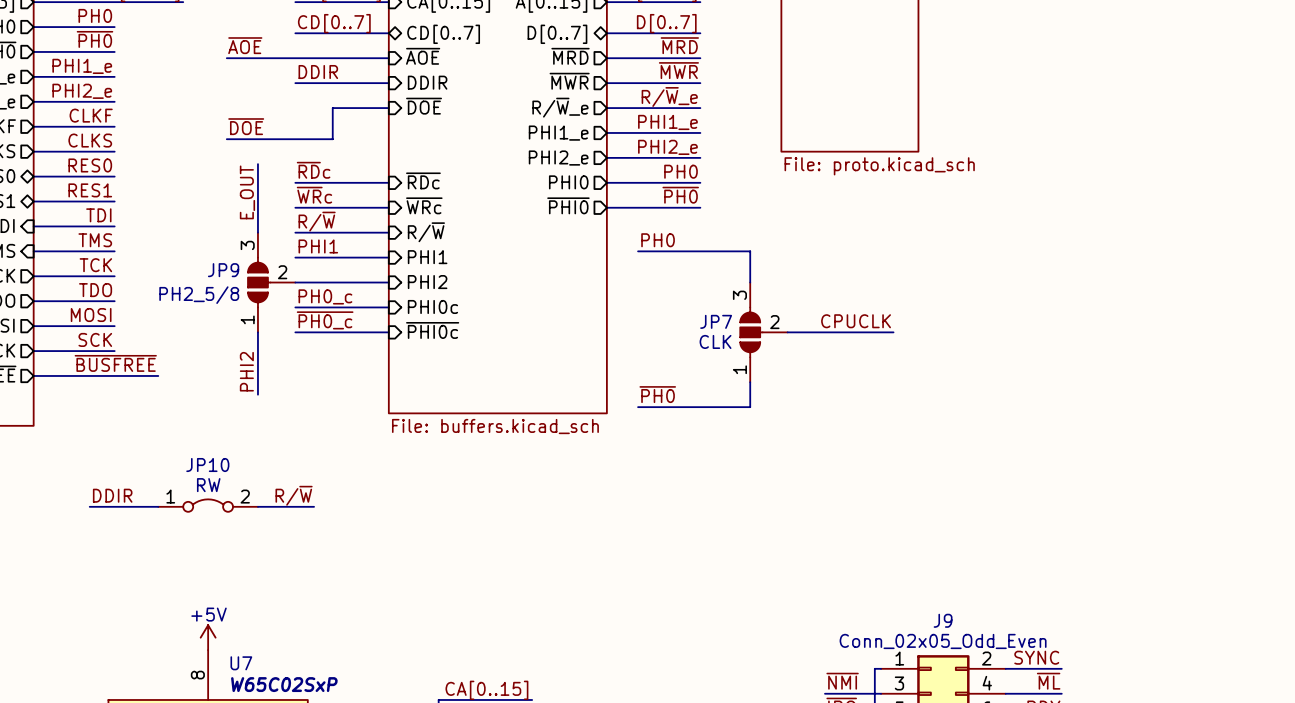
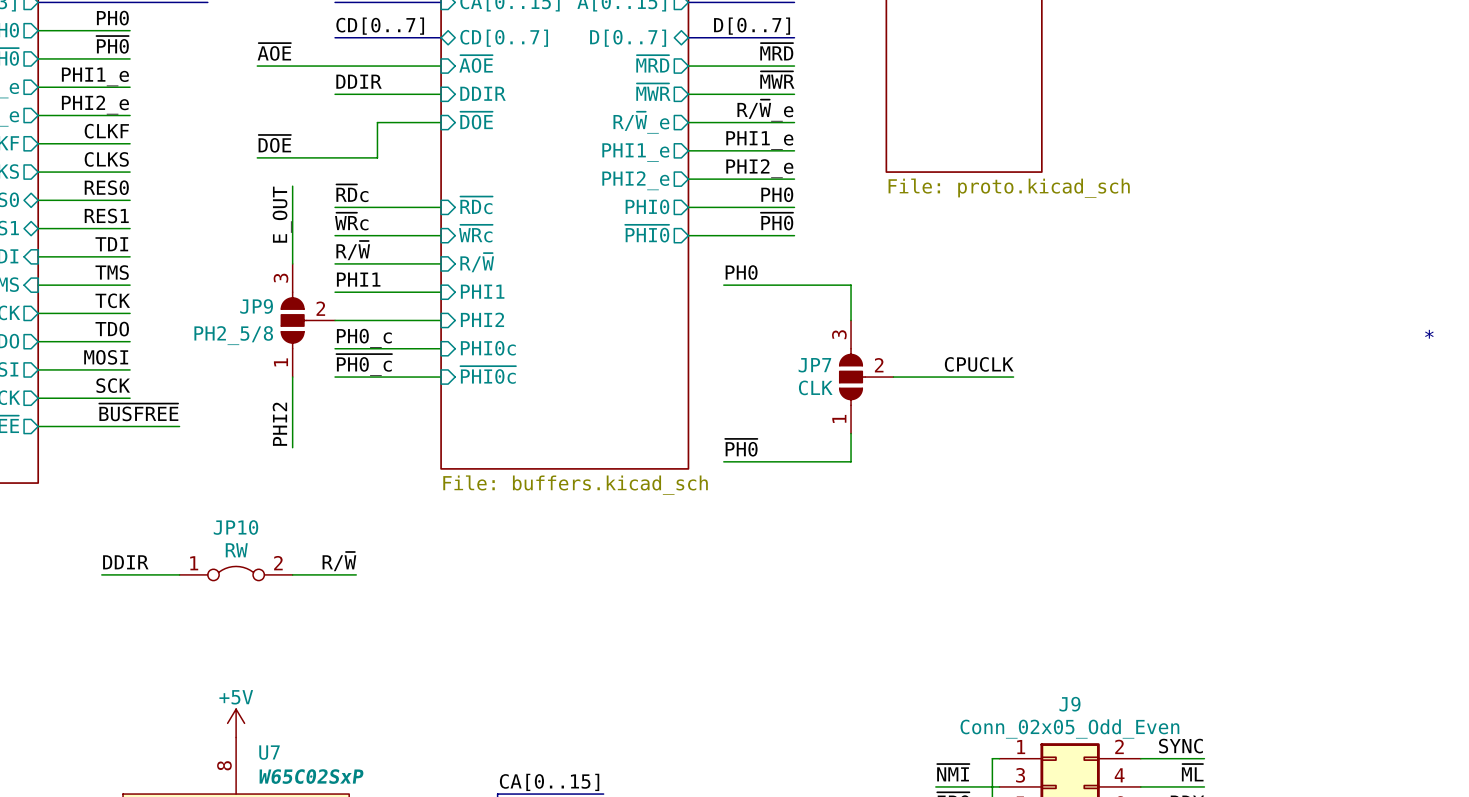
text: none -> * (1429, 334)

